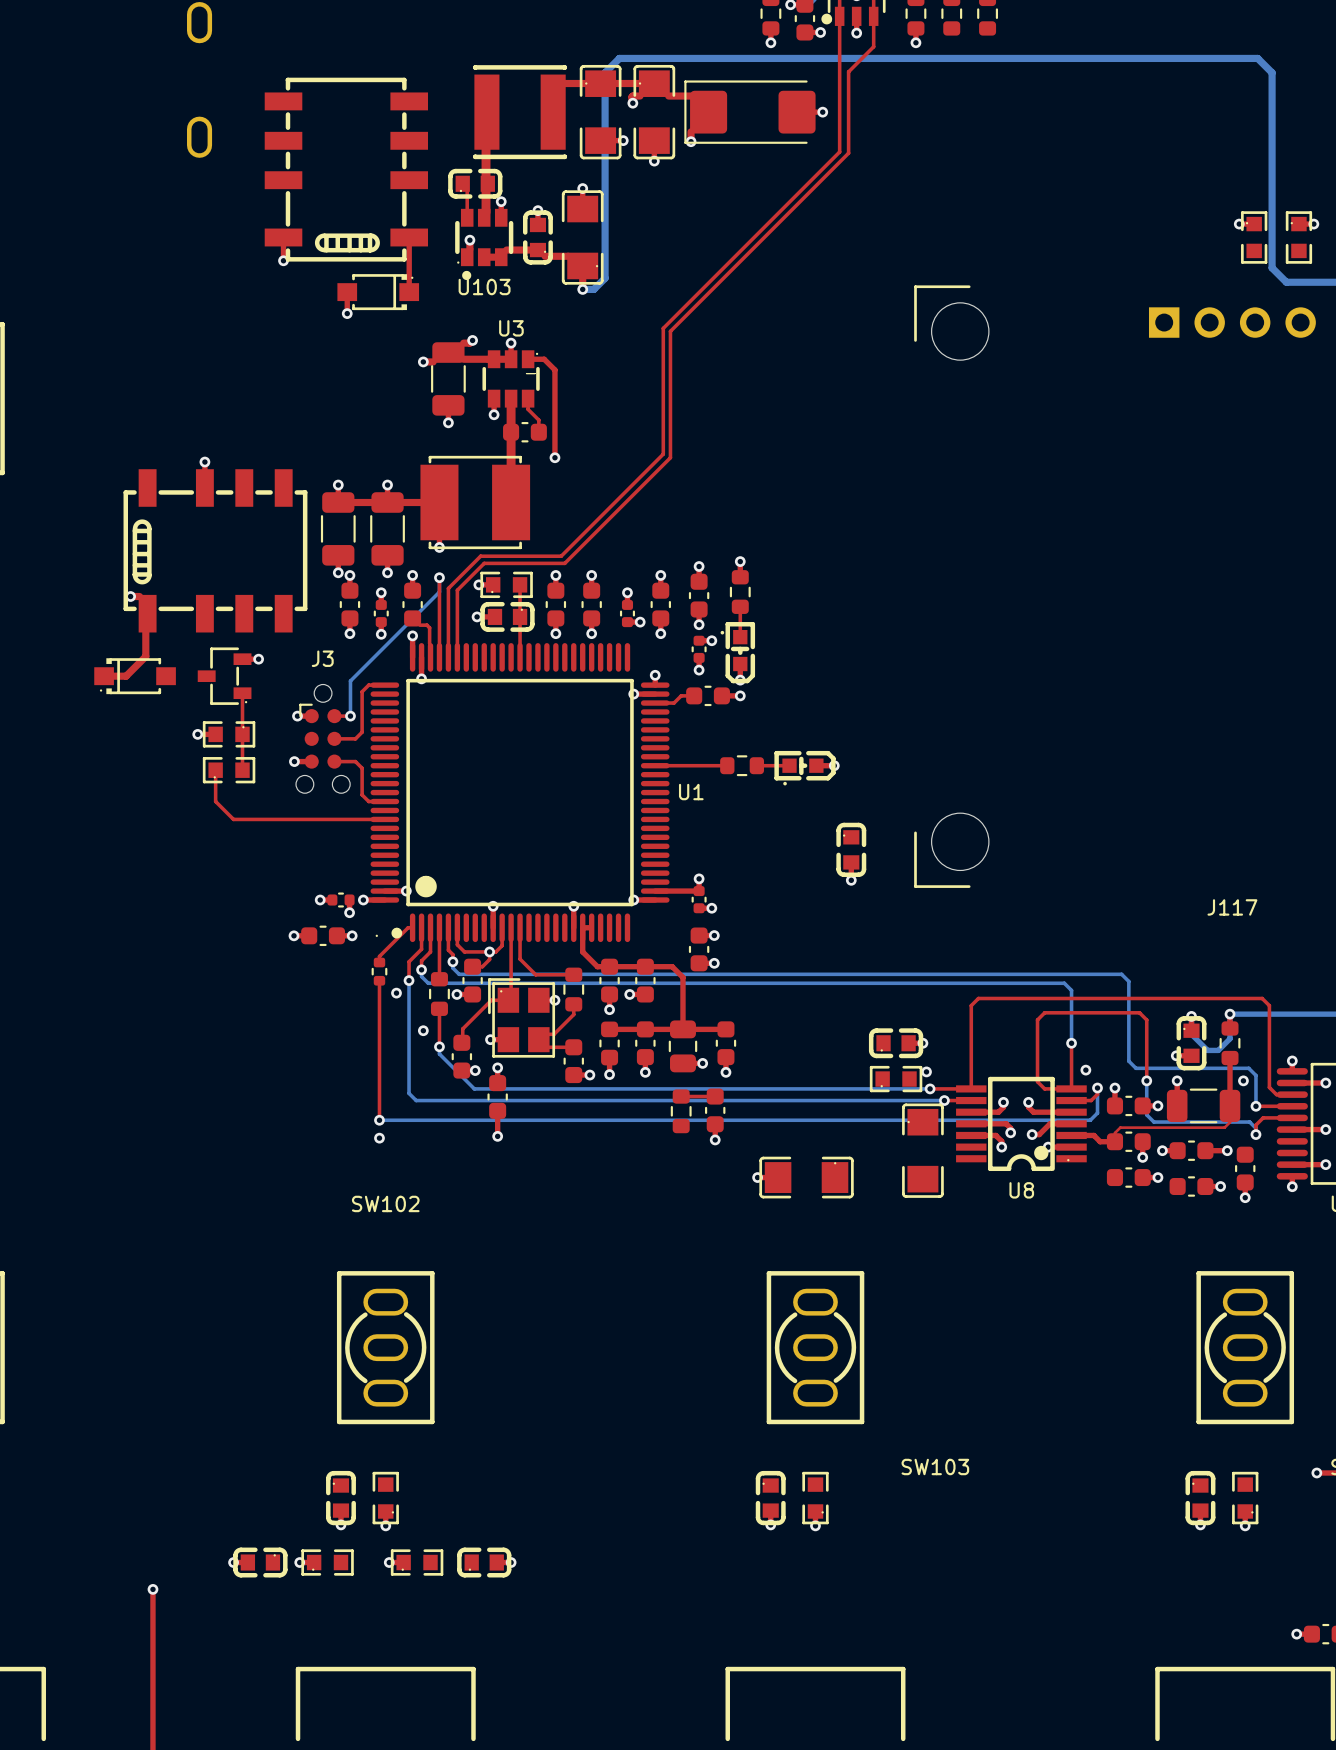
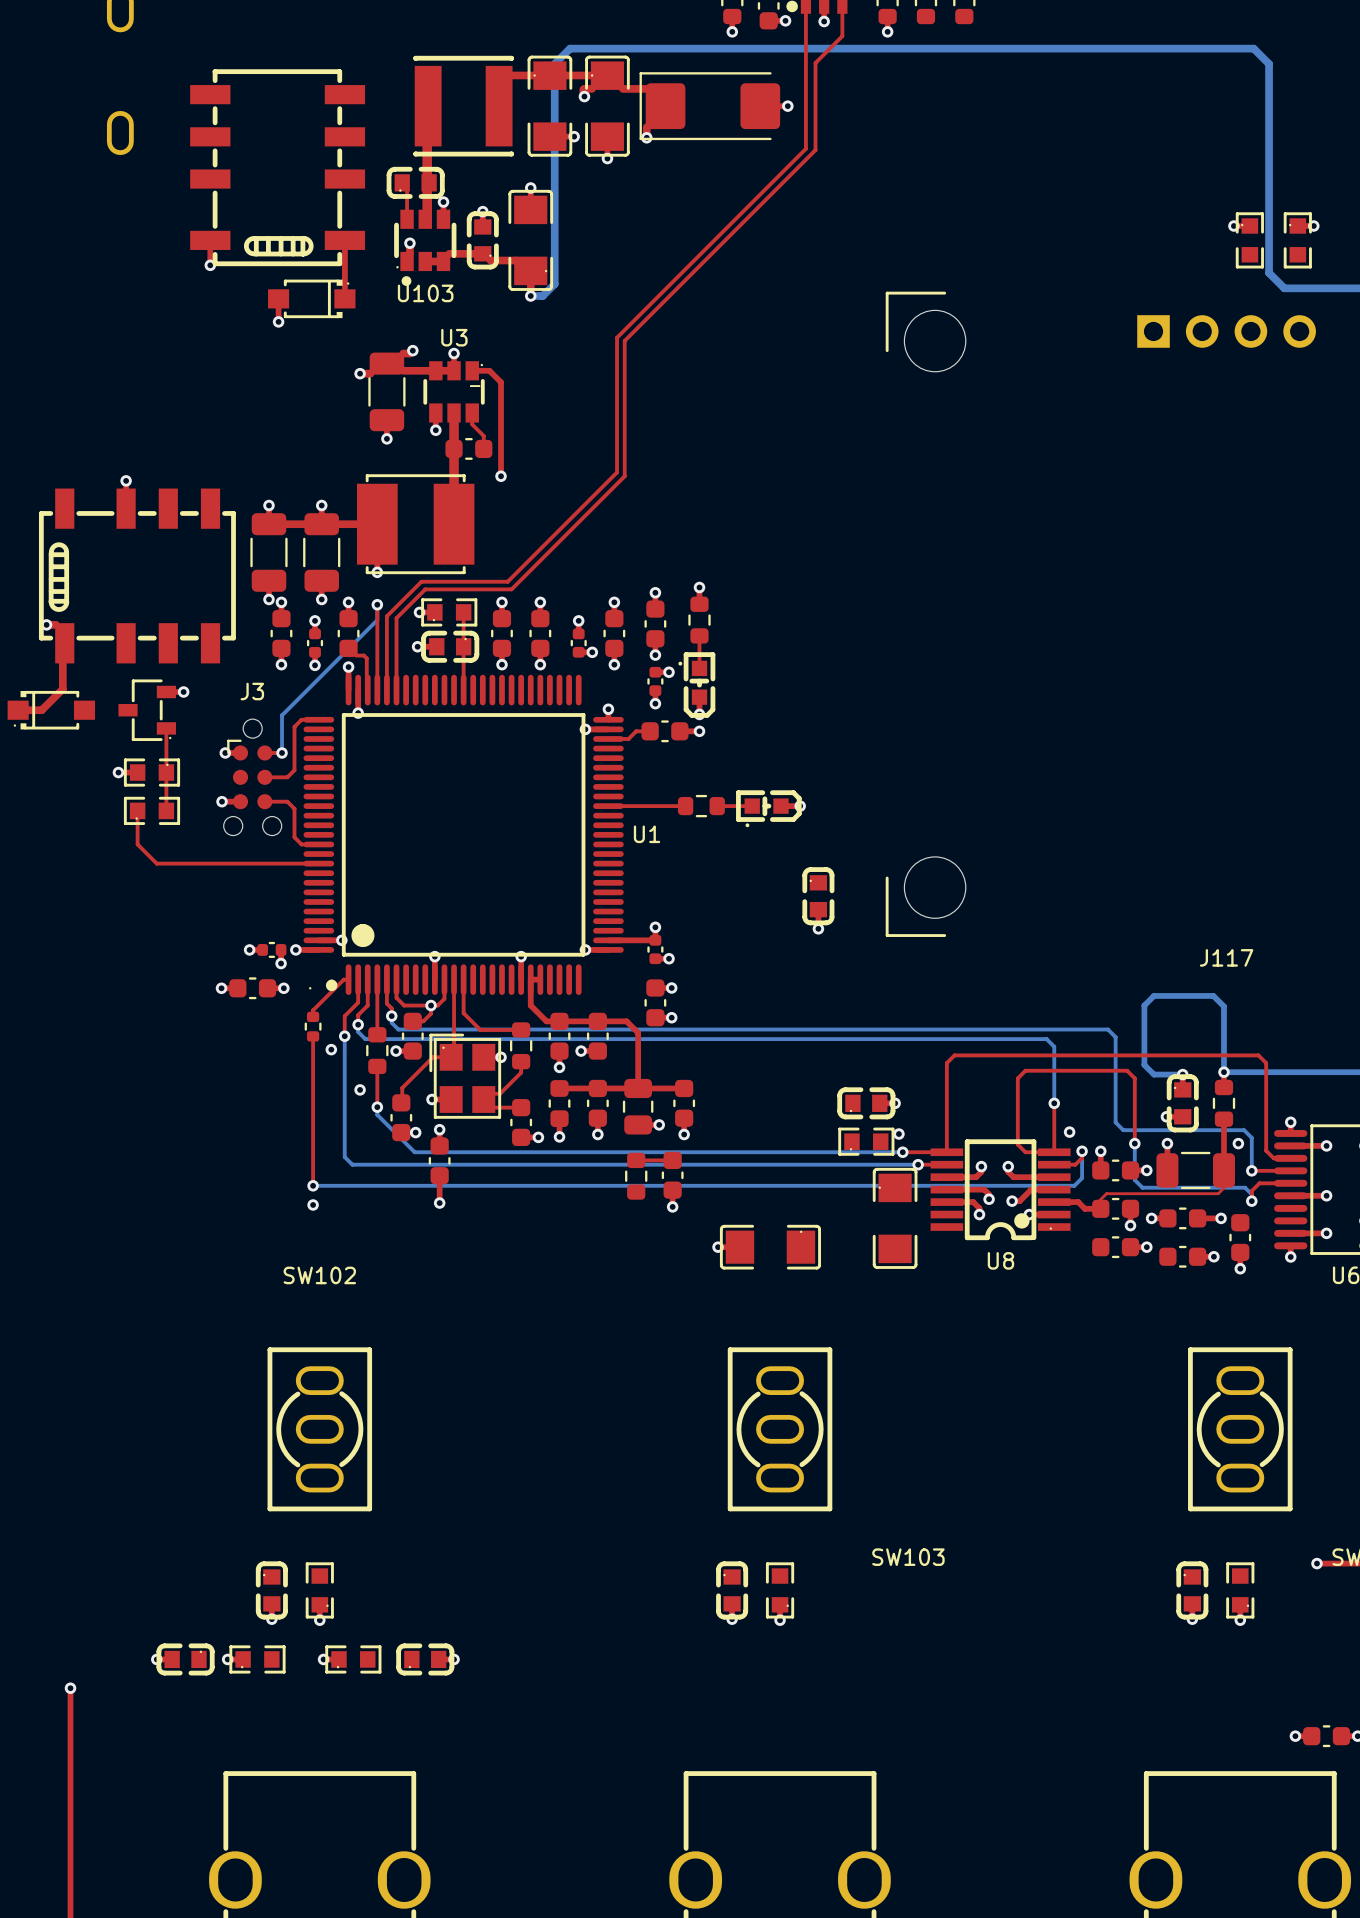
bottom track: (1230, 1014) (1230, 1038) (1218, 1050) (1207, 1050) (1191, 1034) (1191, 1016) -> (1223, 1072) (1223, 1006) (1213, 995) (1153, 995) (1144, 1005) (1144, 1064) (1153, 1074) (1182, 1074)

